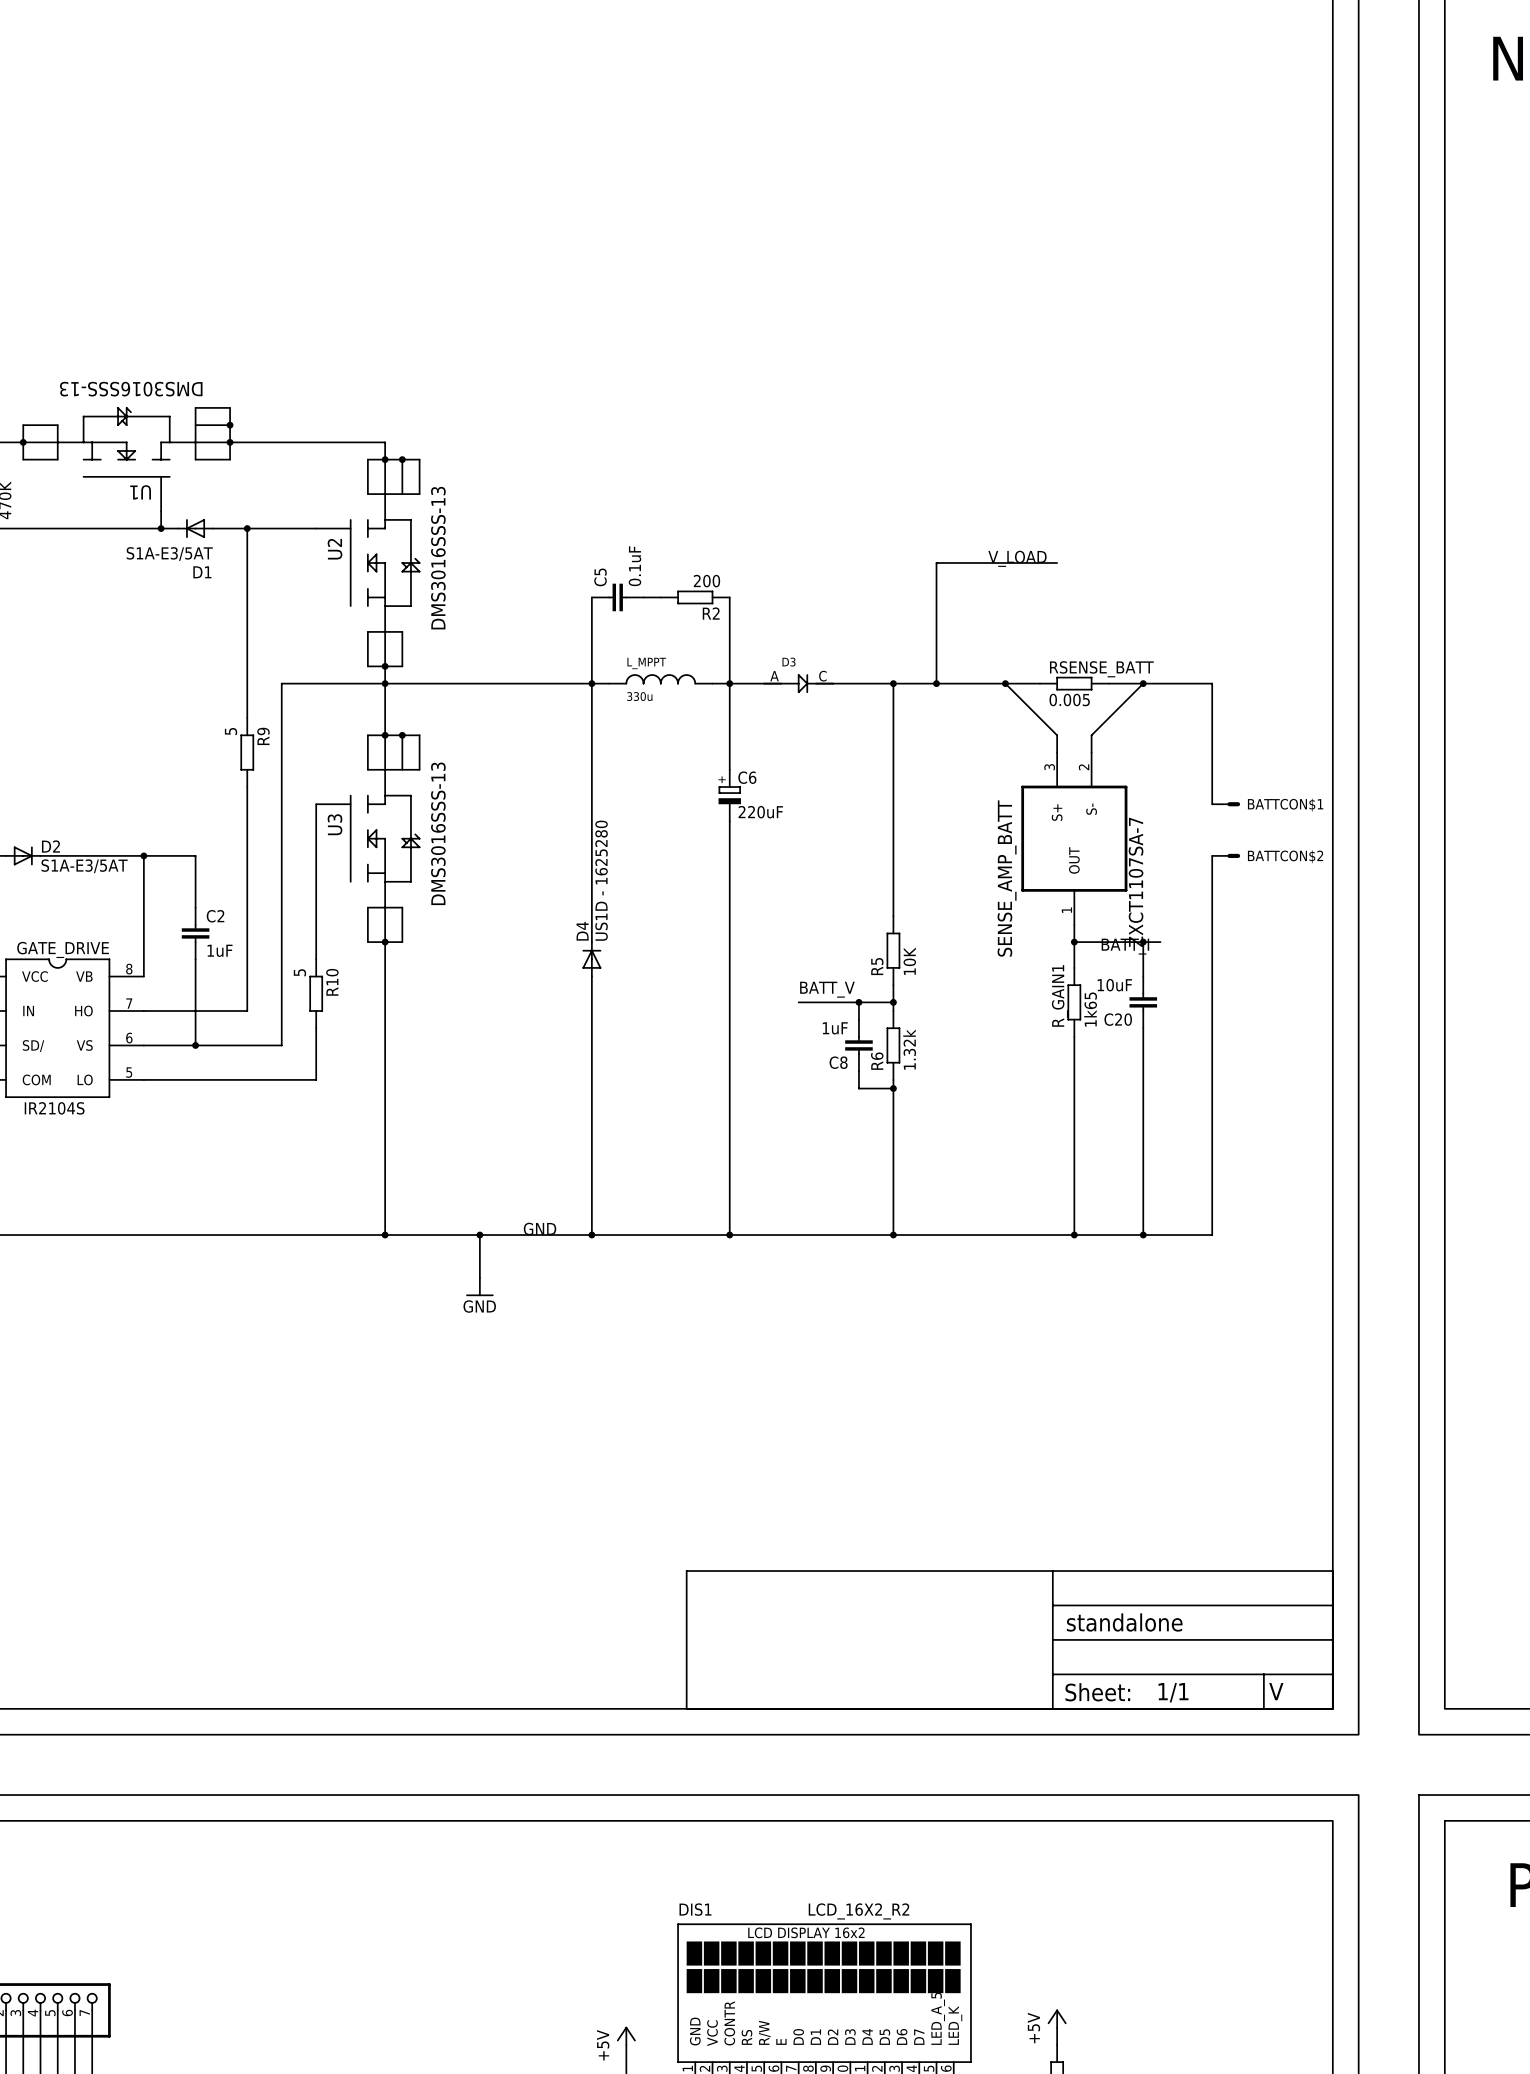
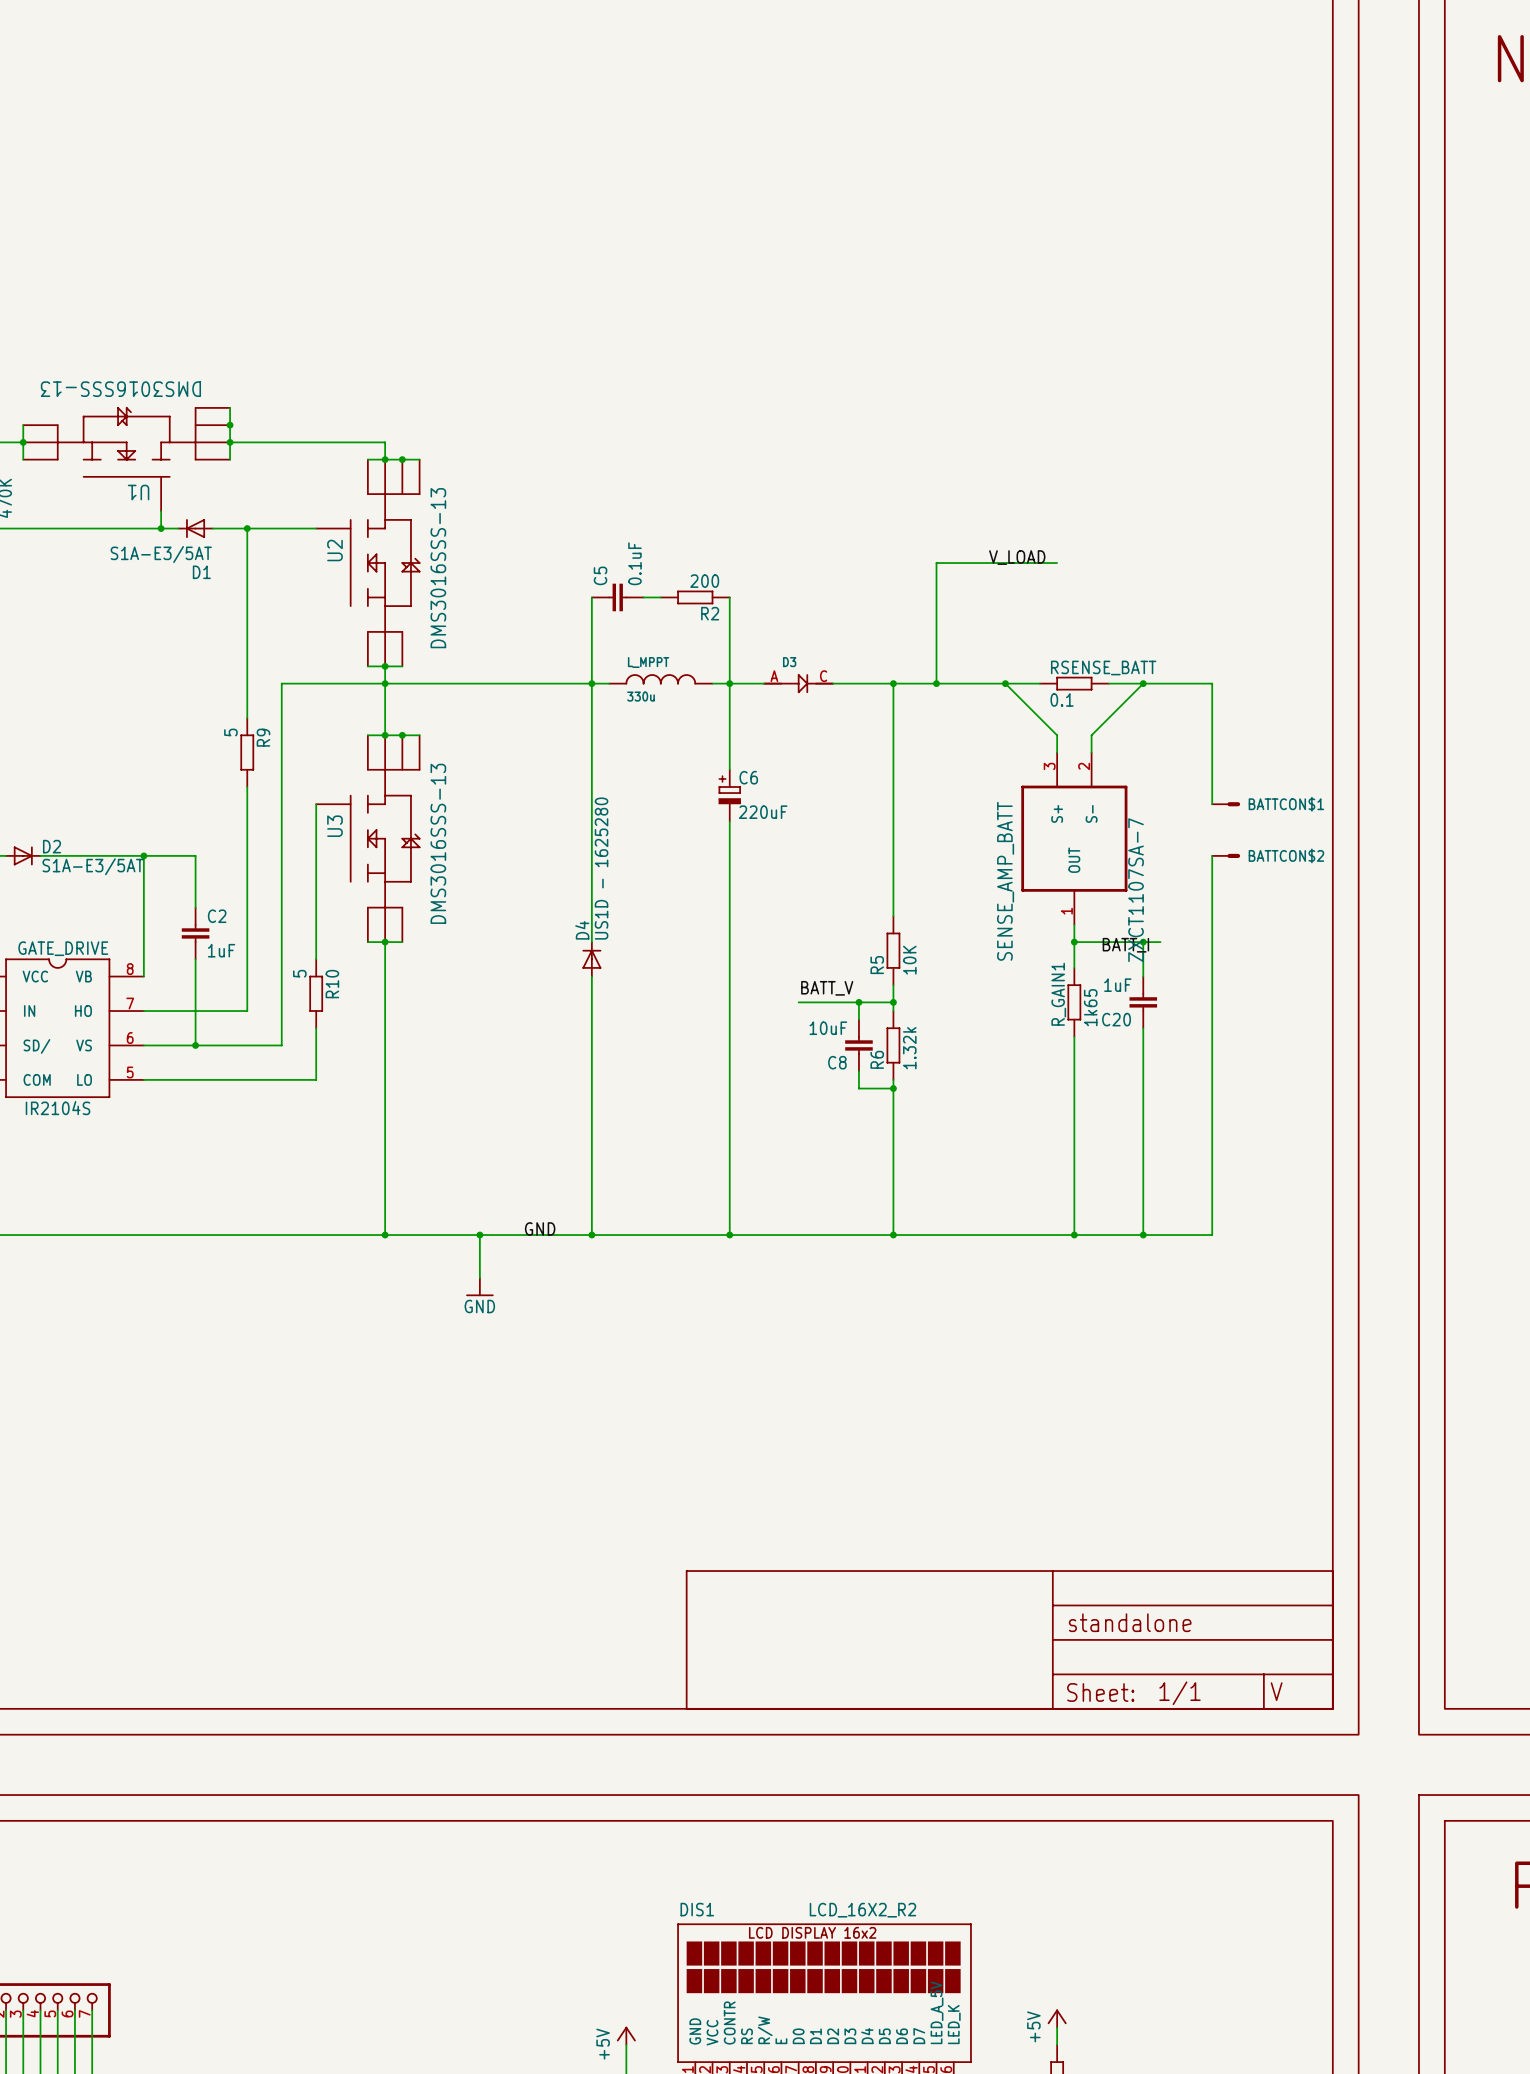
RSENSE_BATT value: 0.005 (1069, 700) -> 0.1 (1062, 699)
C20 value: 10uF (1114, 985) -> 1uF (1117, 985)
C8 value: 1uF (835, 1028) -> 10uF (828, 1028)

